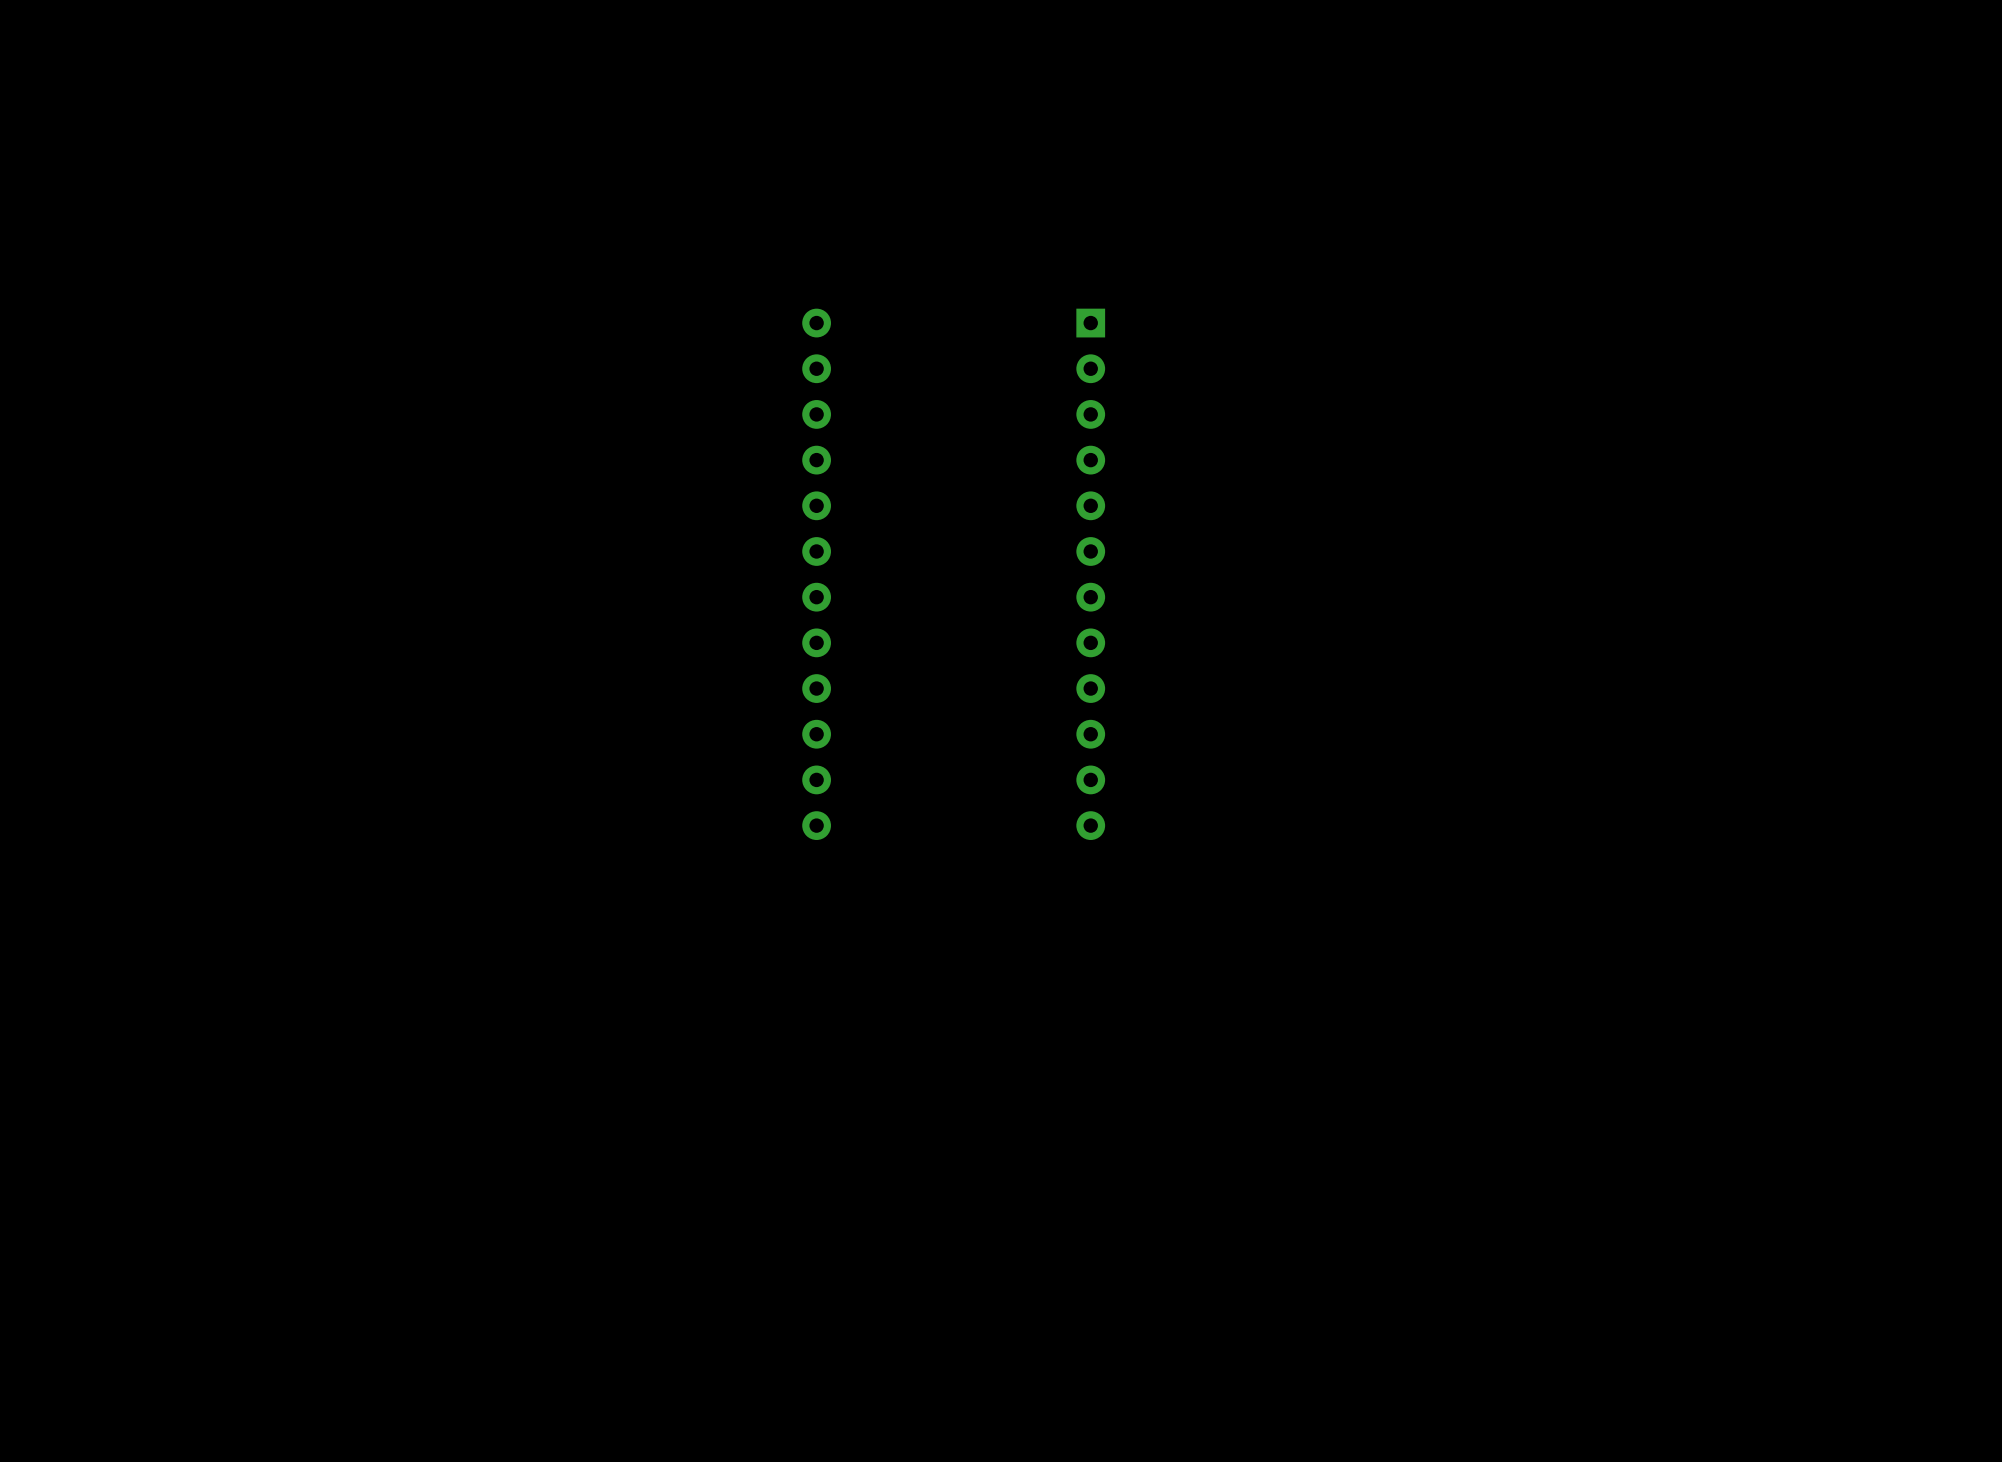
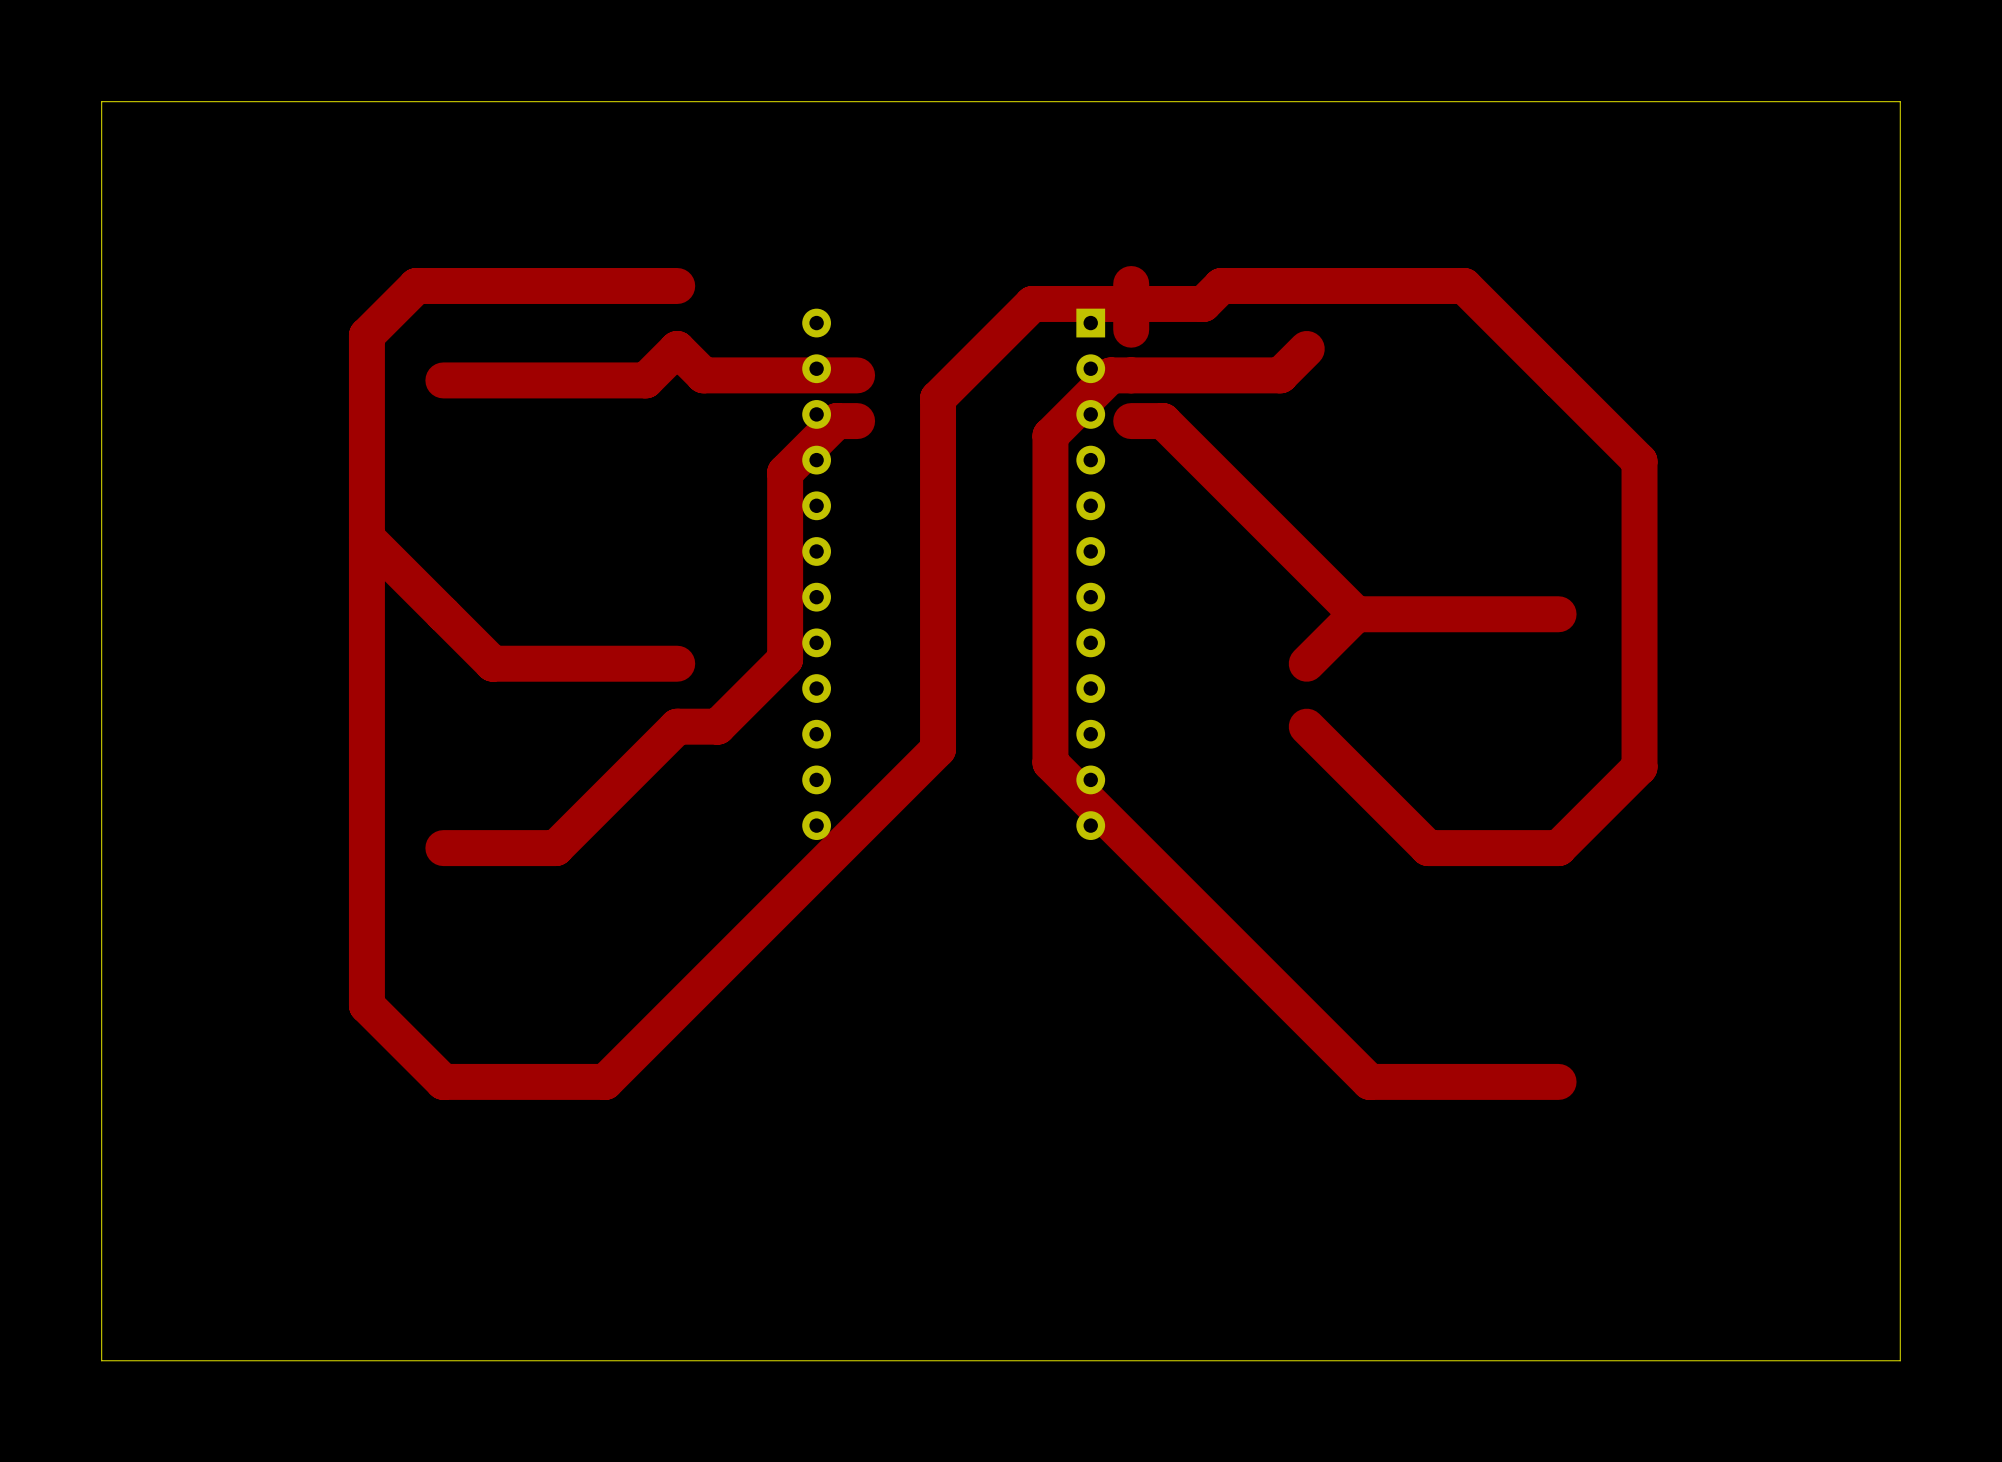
board edge: none -> (1900, 101) (101, 101) (101, 1360) (1900, 1360) (1900, 101)
top track: none -> (1131, 284) (1131, 329)
top track: none -> (677, 285) (416, 285) (366, 335) (366, 1005) (443, 1081) (605, 1081) (938, 749) (938, 398) (1032, 303) (1203, 303) (1221, 285) (1464, 285) (1639, 461) (1639, 767) (1558, 848) (1428, 848) (1306, 726)
top track: none -> (1306, 348) (1280, 375) (1110, 375) (1050, 435) (1050, 762) (1369, 1081) (1558, 1081)
top track: none -> (857, 375) (703, 375) (677, 348) (645, 380) (443, 380)
top track: none -> (857, 421) (836, 421) (785, 472) (785, 659) (717, 726) (677, 726) (555, 848) (443, 848)
top track: none -> (1131, 421) (1163, 421) (1356, 614)
top track: none -> (366, 537) (492, 663) (677, 663)
top track: none -> (1356, 614) (1306, 663)
top track: none -> (1558, 614) (1356, 614)

